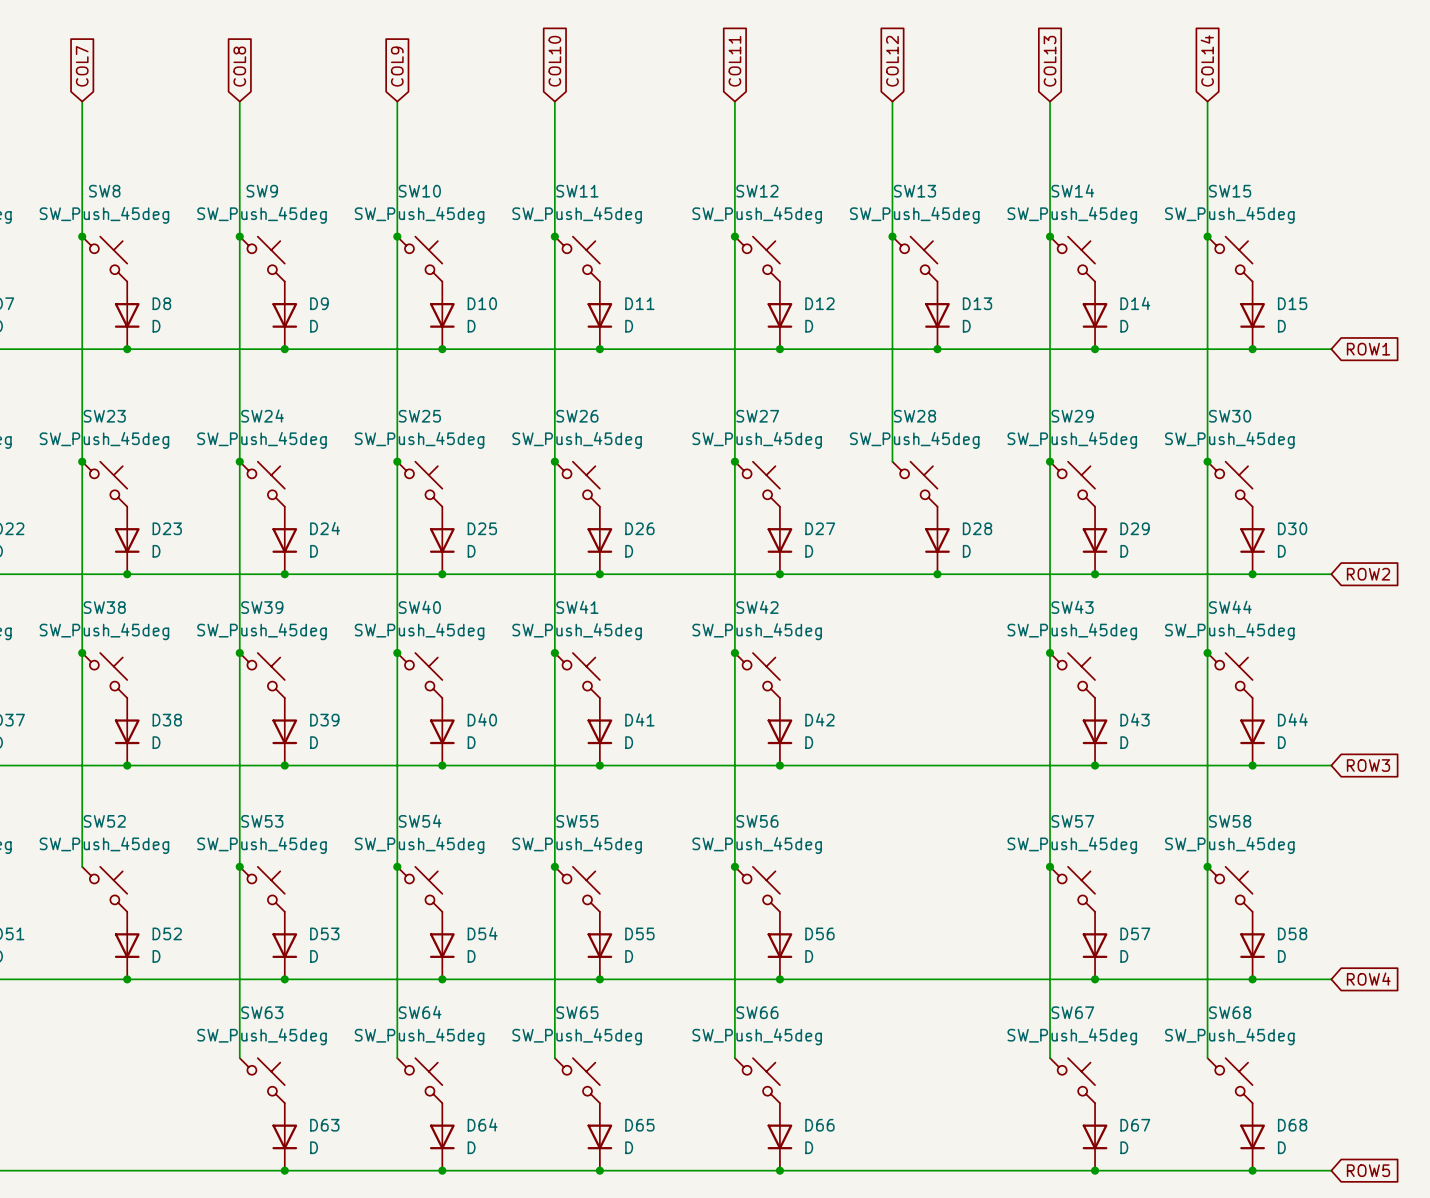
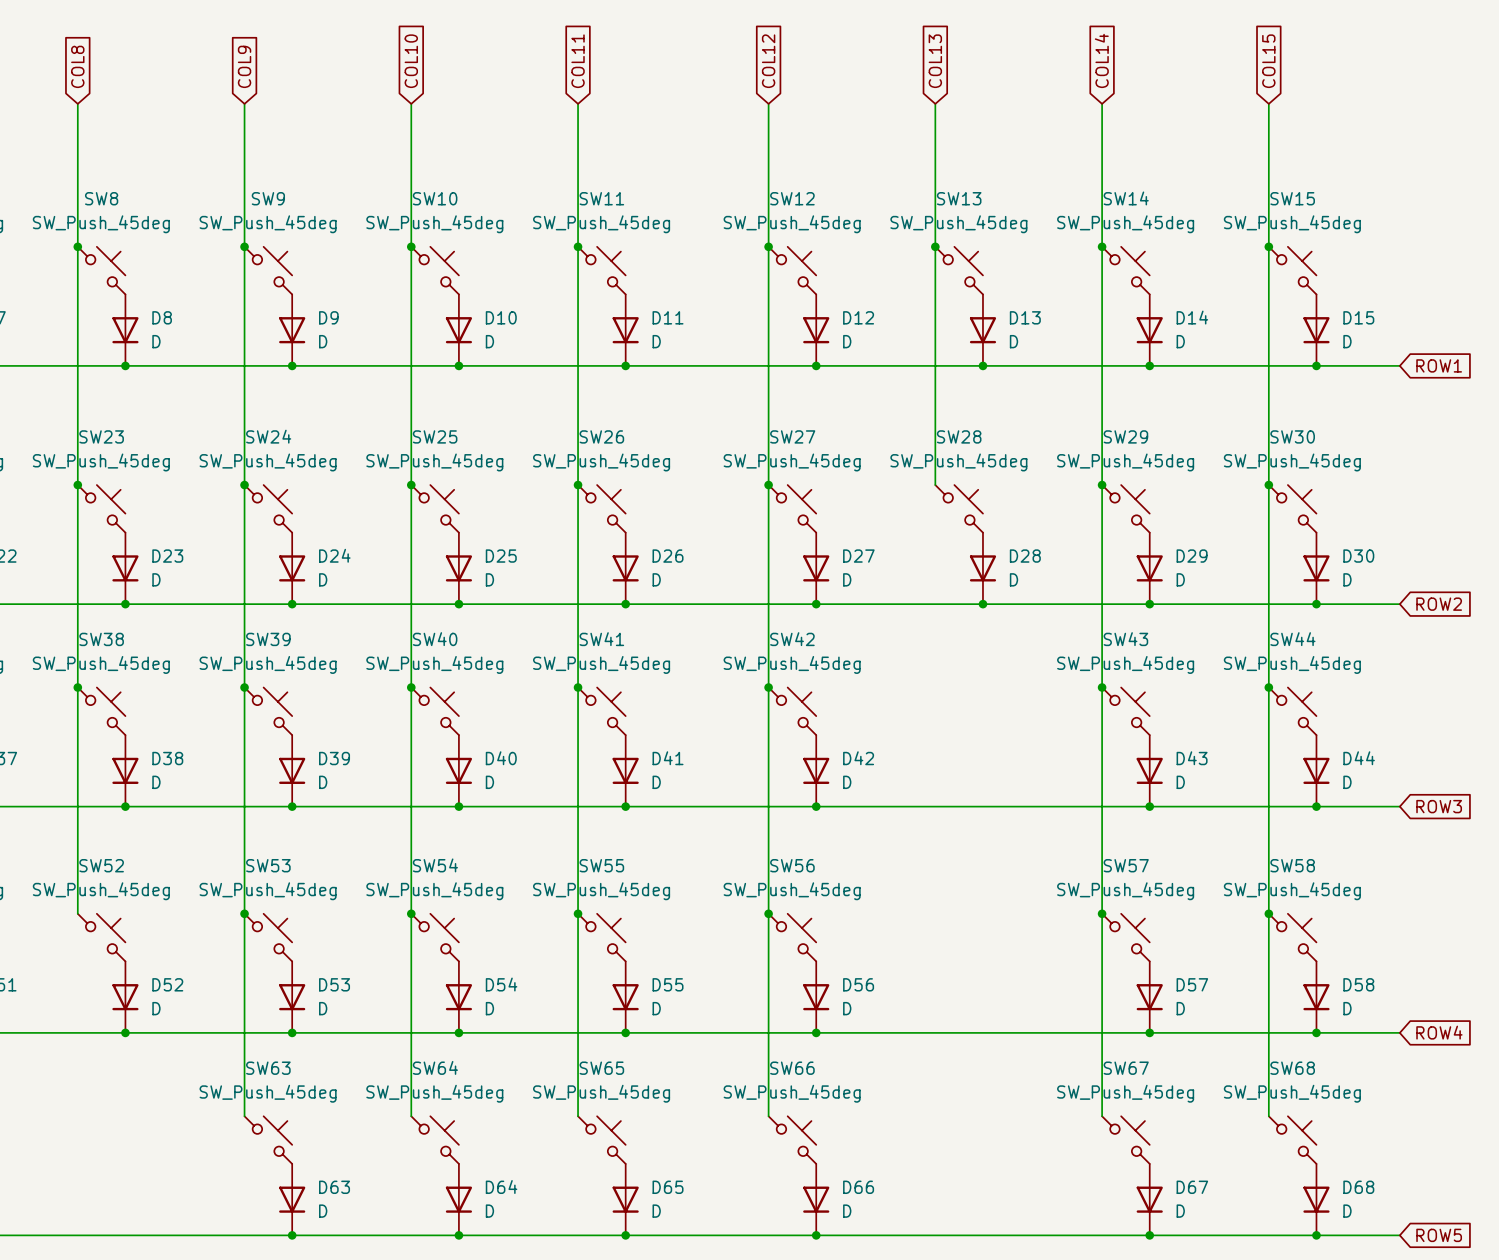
global label: COL14 (1207, 60) -> COL15 (1268, 61)
global label: COL10 (554, 61) -> COL11 (578, 61)
global label: COL11 (734, 61) -> COL12 (768, 61)
global label: COL12 (892, 61) -> COL13 (935, 61)
global label: COL13 (1050, 61) -> COL14 (1101, 60)
global label: COL7 (82, 66) -> COL8 (77, 66)
global label: COL8 (239, 66) -> COL9 (244, 66)
global label: COL9 (397, 66) -> COL10 (411, 61)

